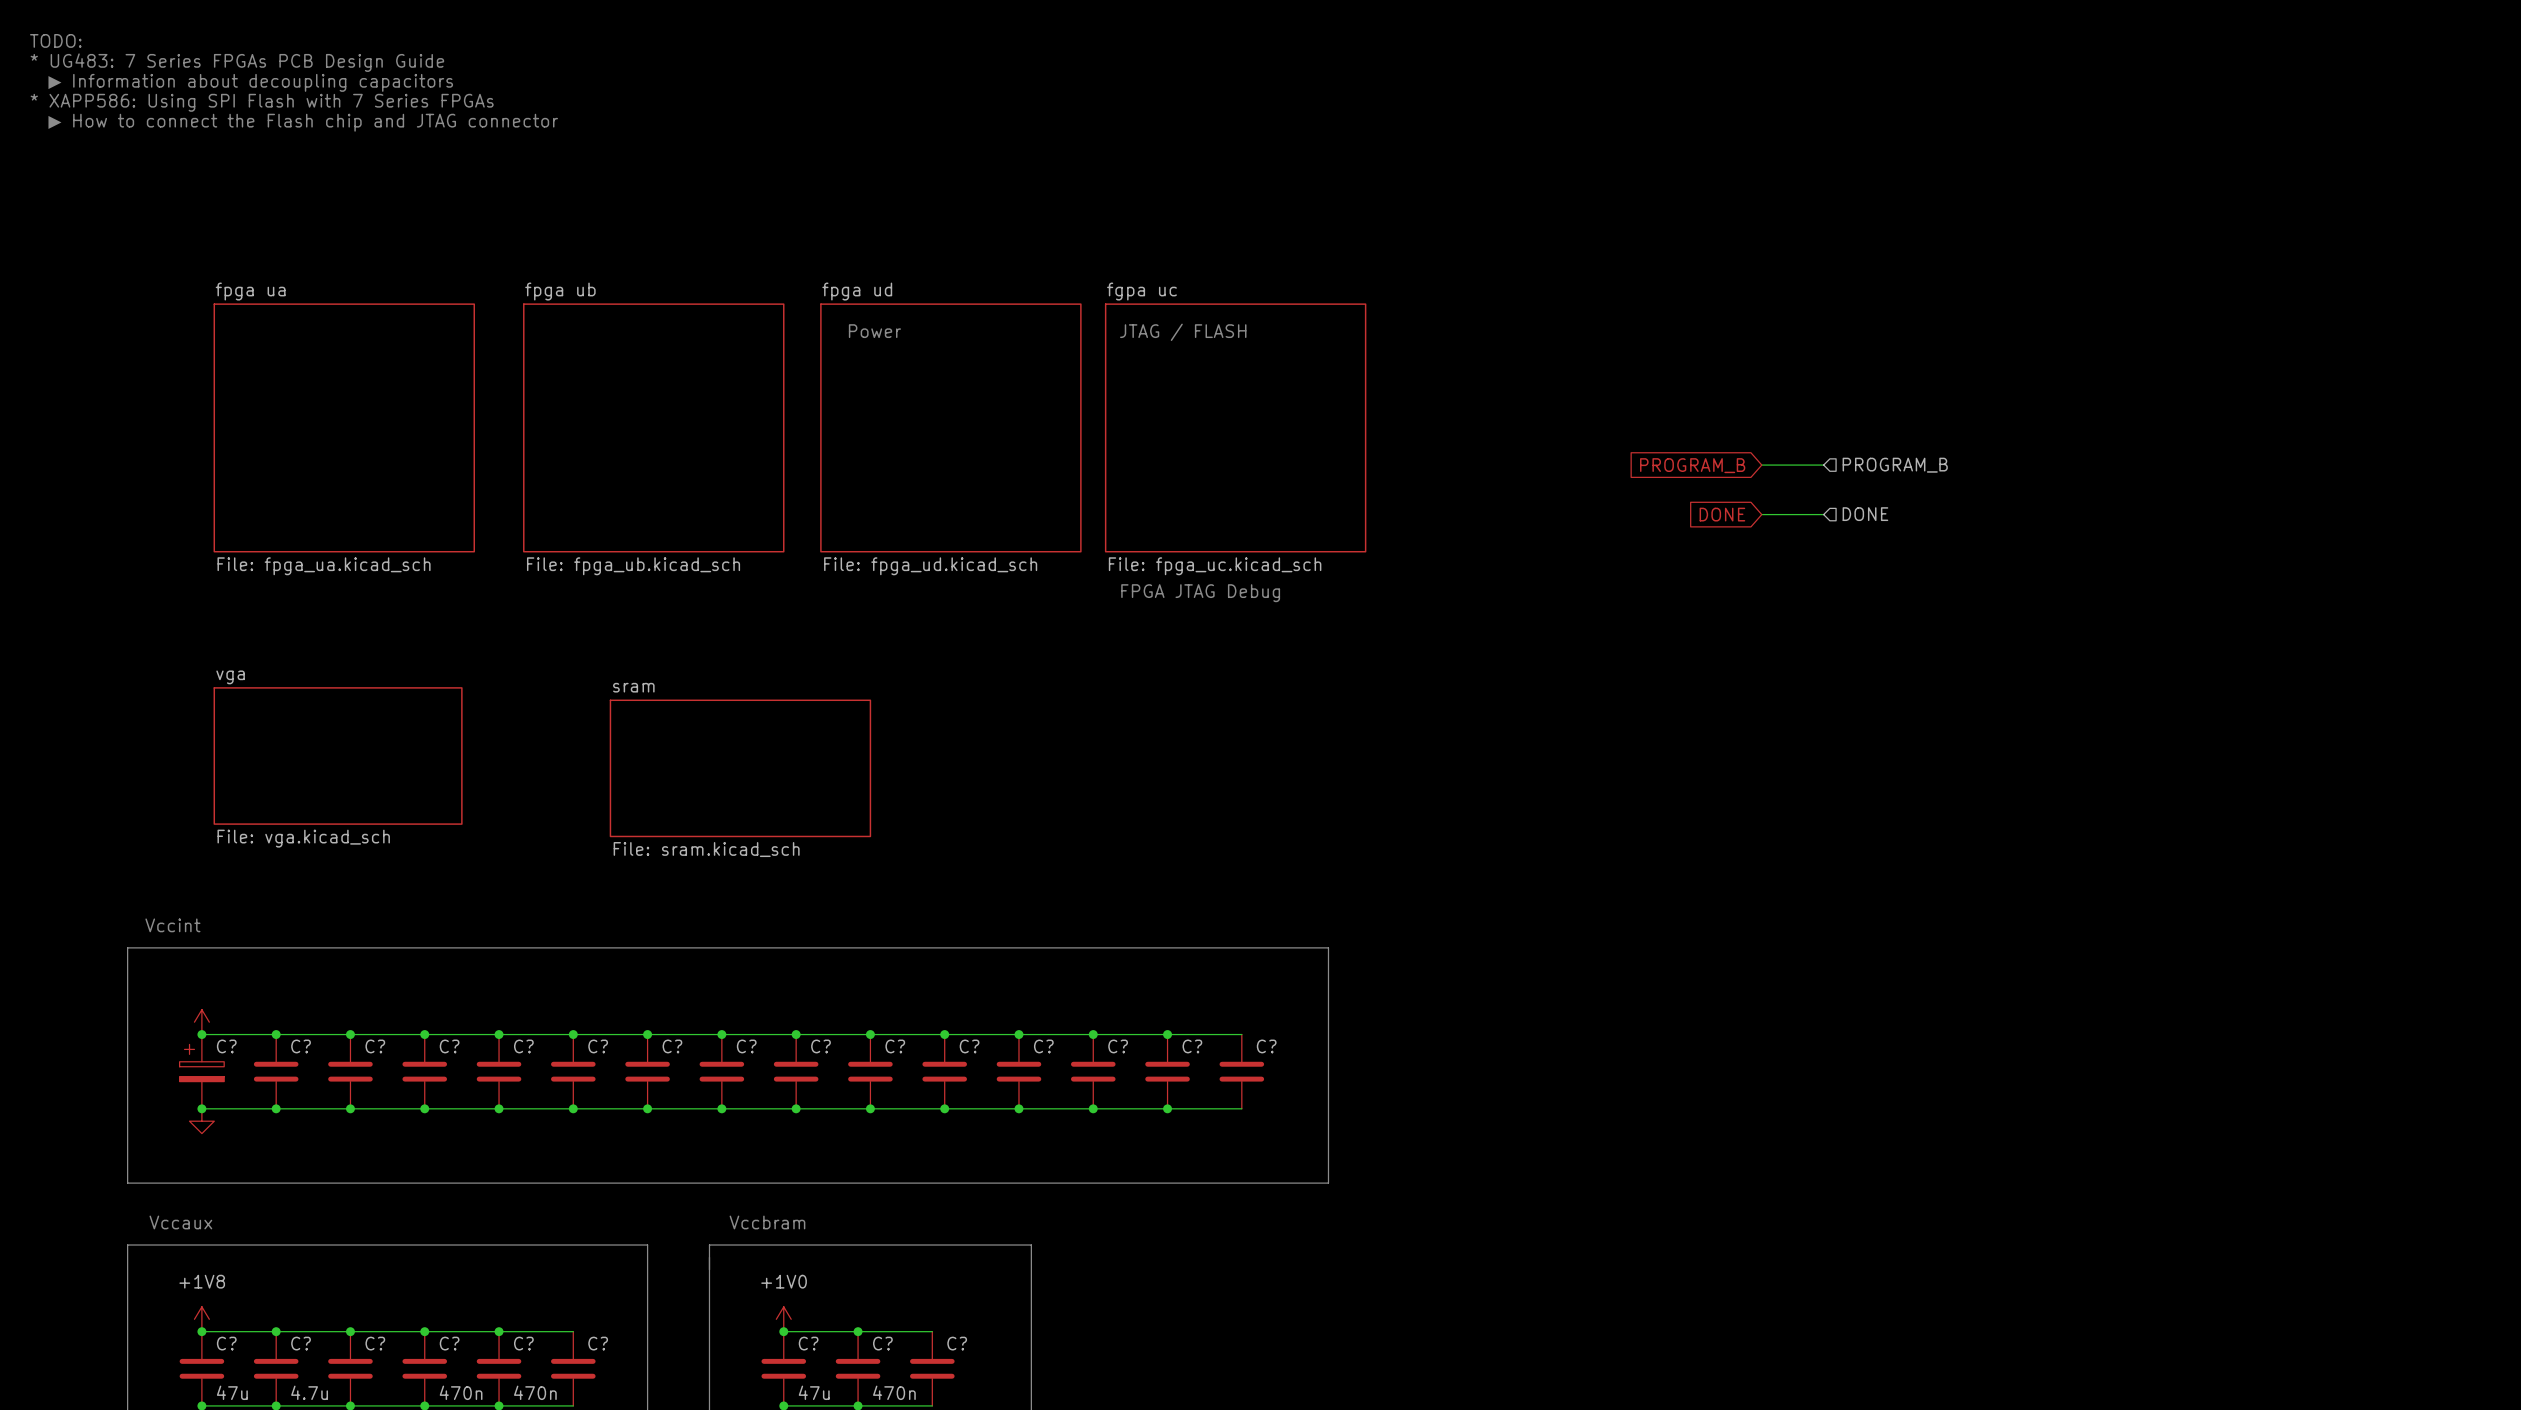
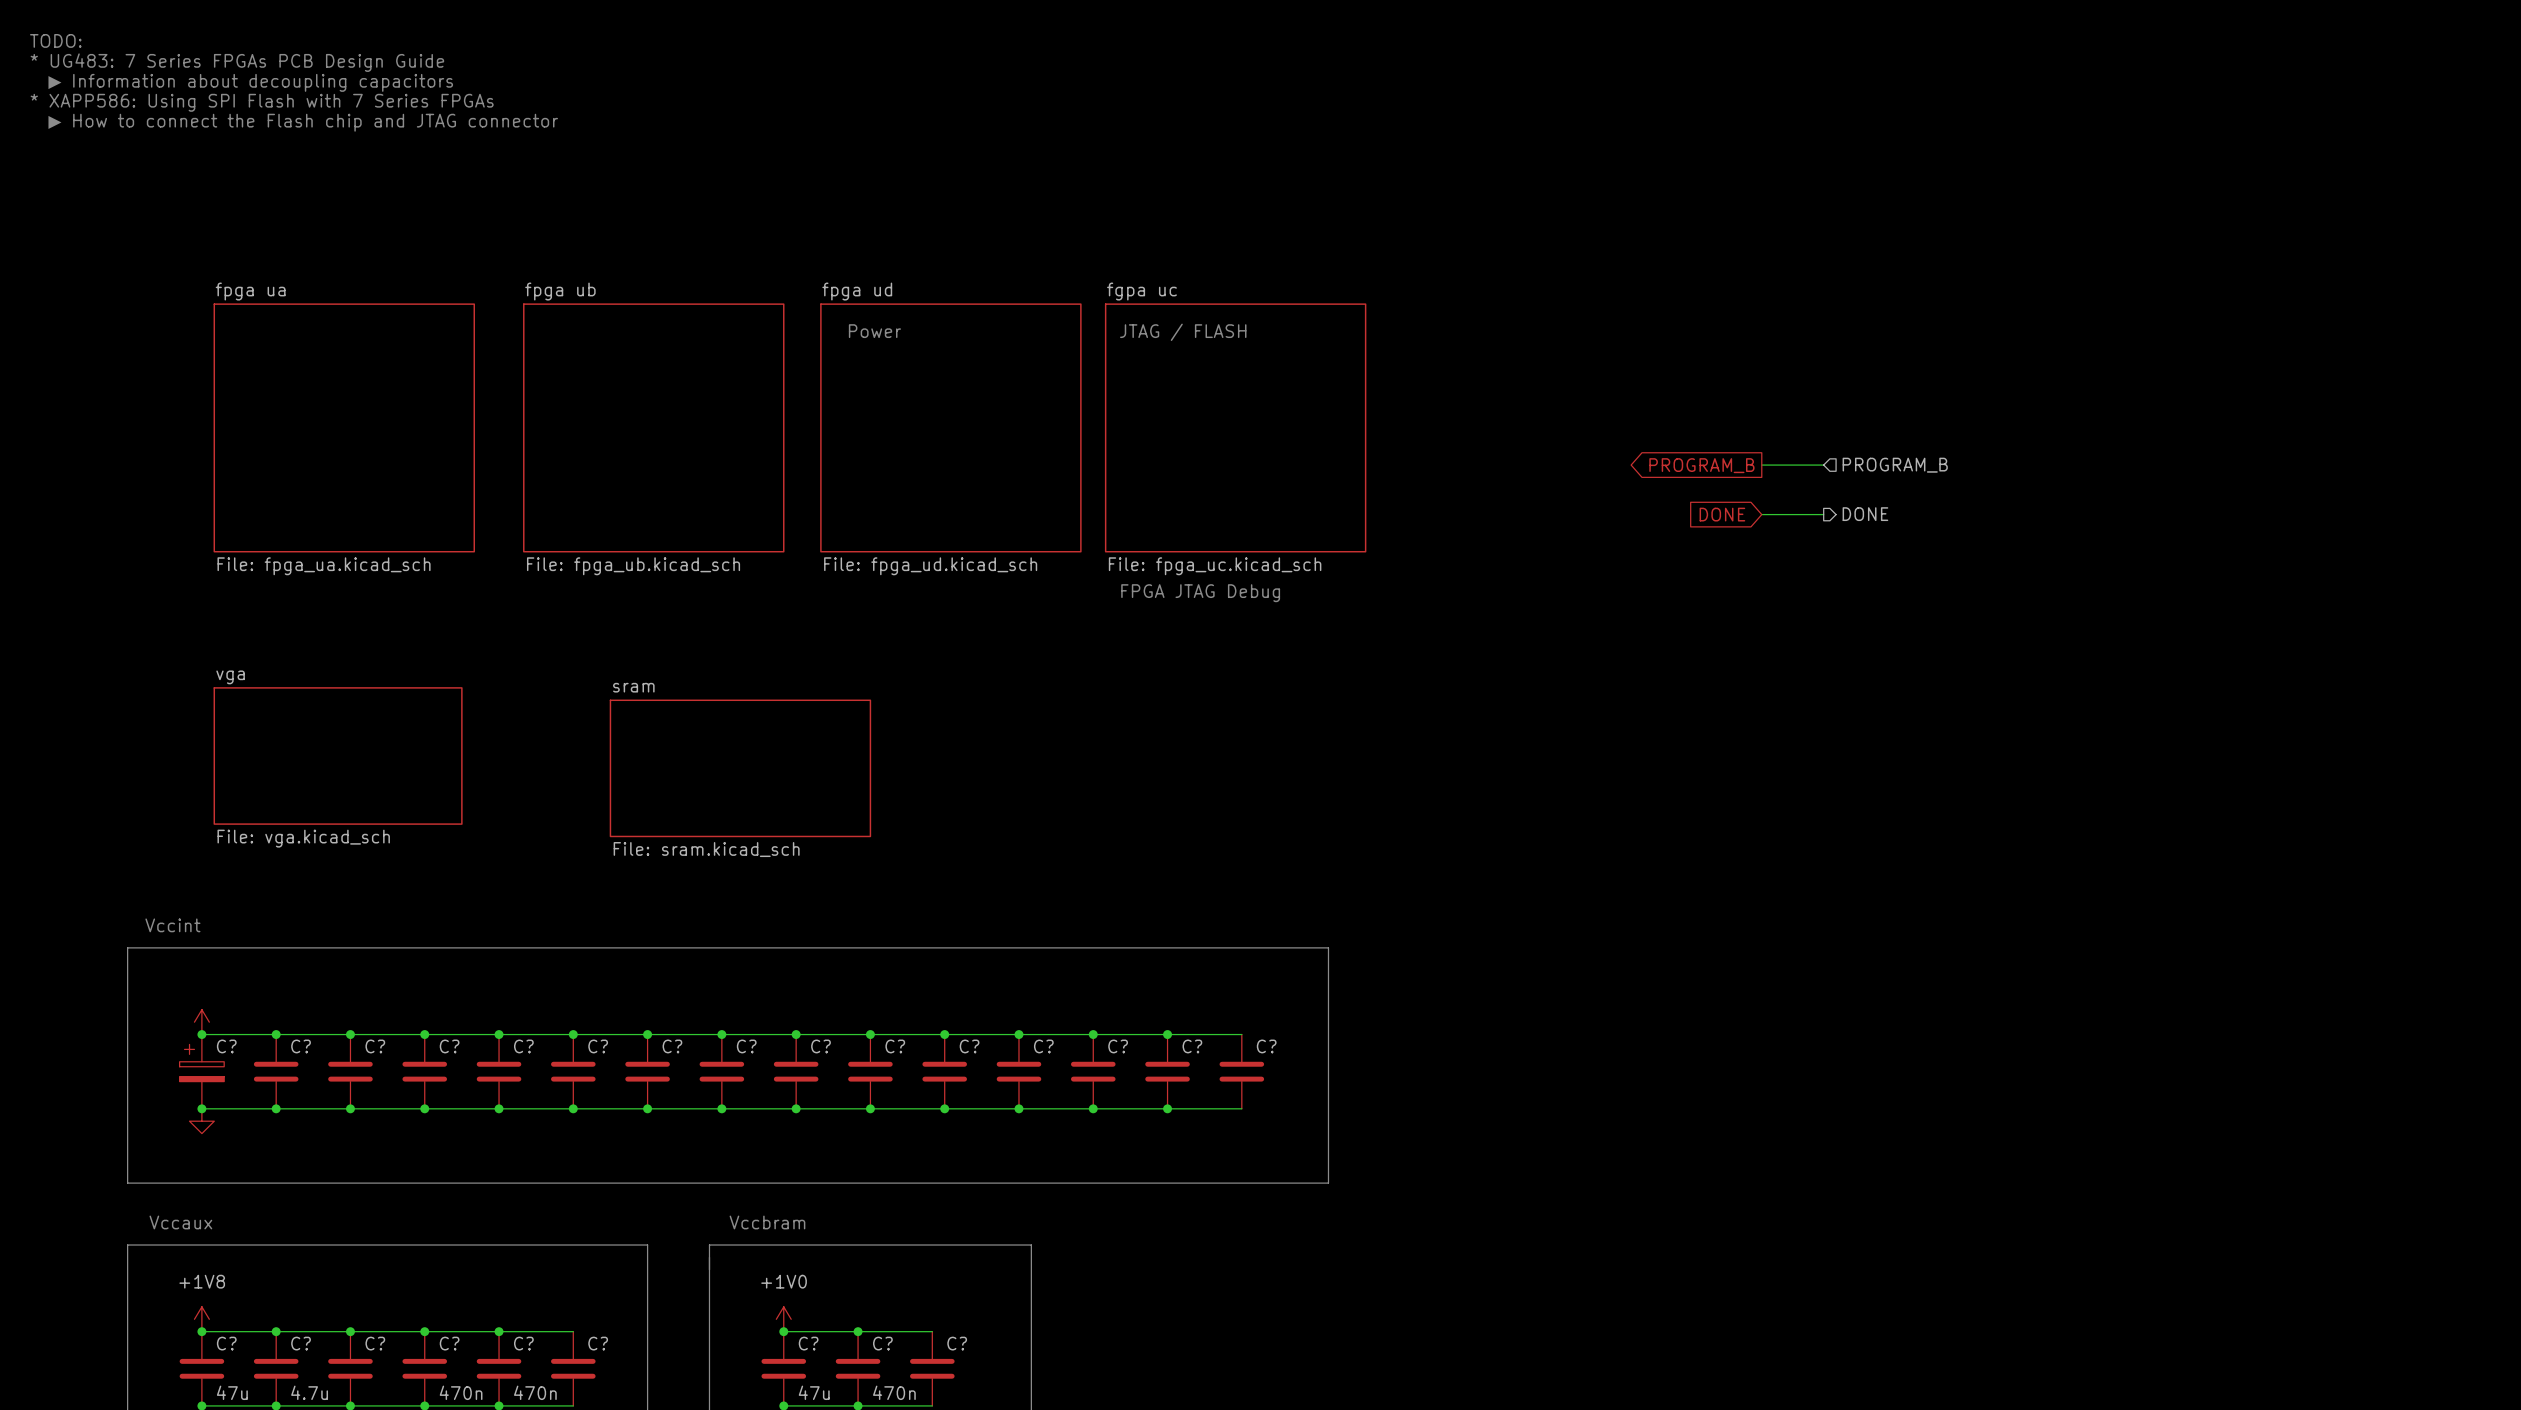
global label shape: input (1692, 465) -> output (1701, 465)
hierarchical label shape: input (1865, 514) -> output (1865, 514)

